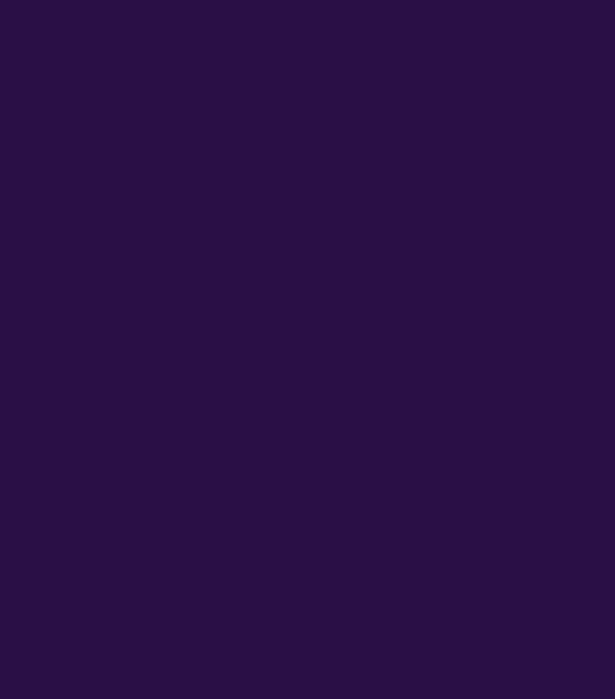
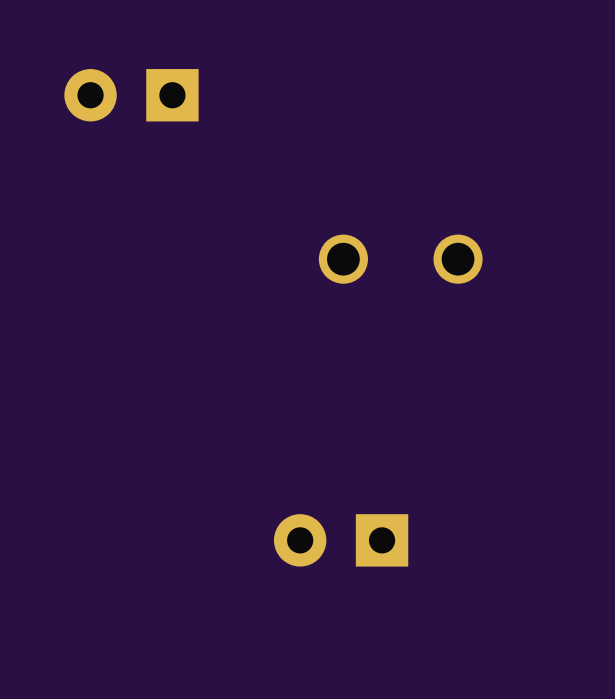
part: none -> (131, 95)
part: none -> (400, 259)
part: none -> (341, 540)

